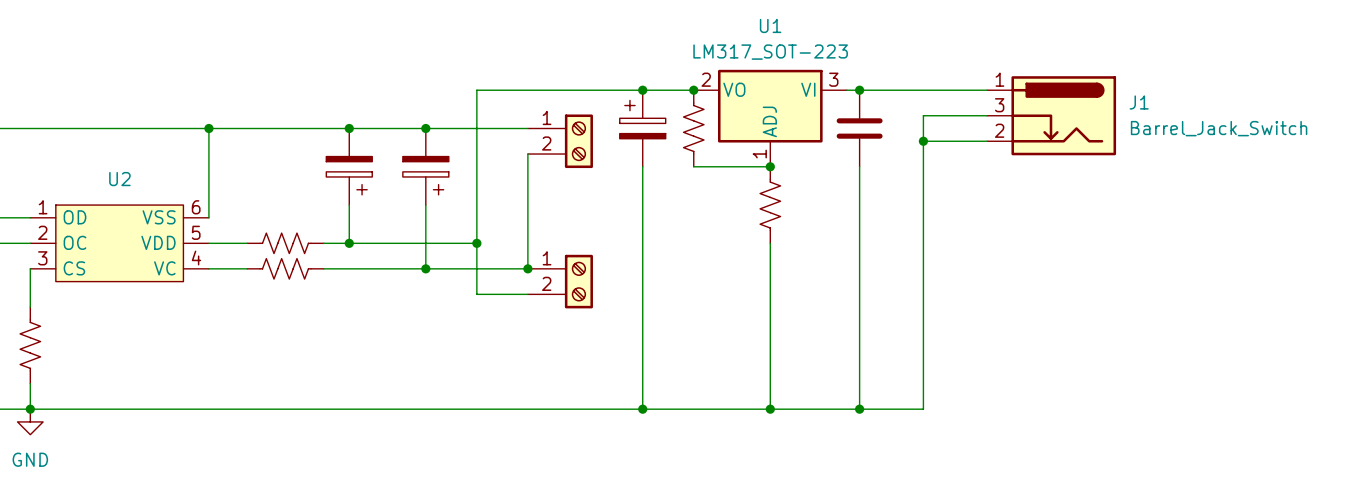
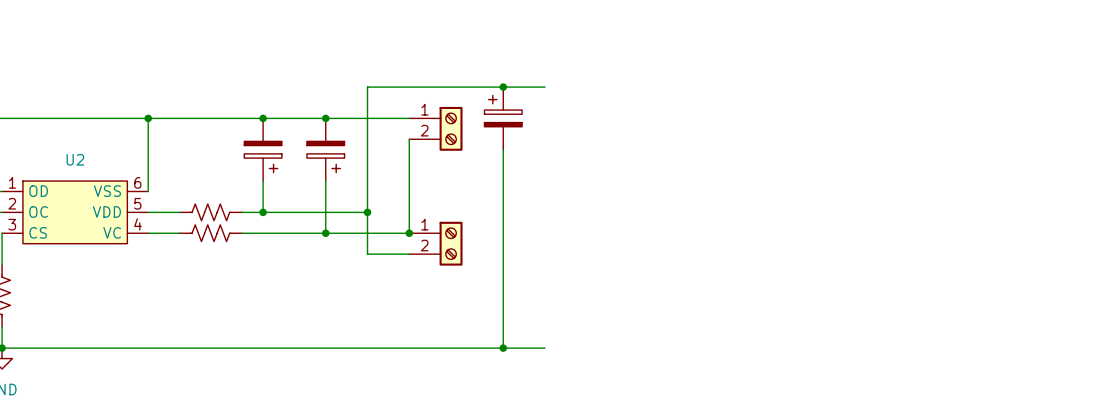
junction: (693, 90) -> none
wire: (846, 90) (987, 90) -> none
junction: (859, 90) -> none
wire: (987, 115) (923, 115) (923, 409) (693, 409) -> none
J1: Barrel_Jack_Switch (1051, 115) -> none
U1: LM317_SOT-223 (770, 118) -> none
part: (693, 128) -> none
part: (859, 128) -> none
wire: (923, 141) (987, 141) -> none
junction: (923, 141) -> none
wire: (693, 166) (770, 166) -> none
junction: (770, 166) -> none
wire: (859, 166) (859, 409) -> none
part: (770, 205) -> none
wire: (770, 243) (770, 409) -> none
junction: (770, 409) -> none
junction: (859, 409) -> none

